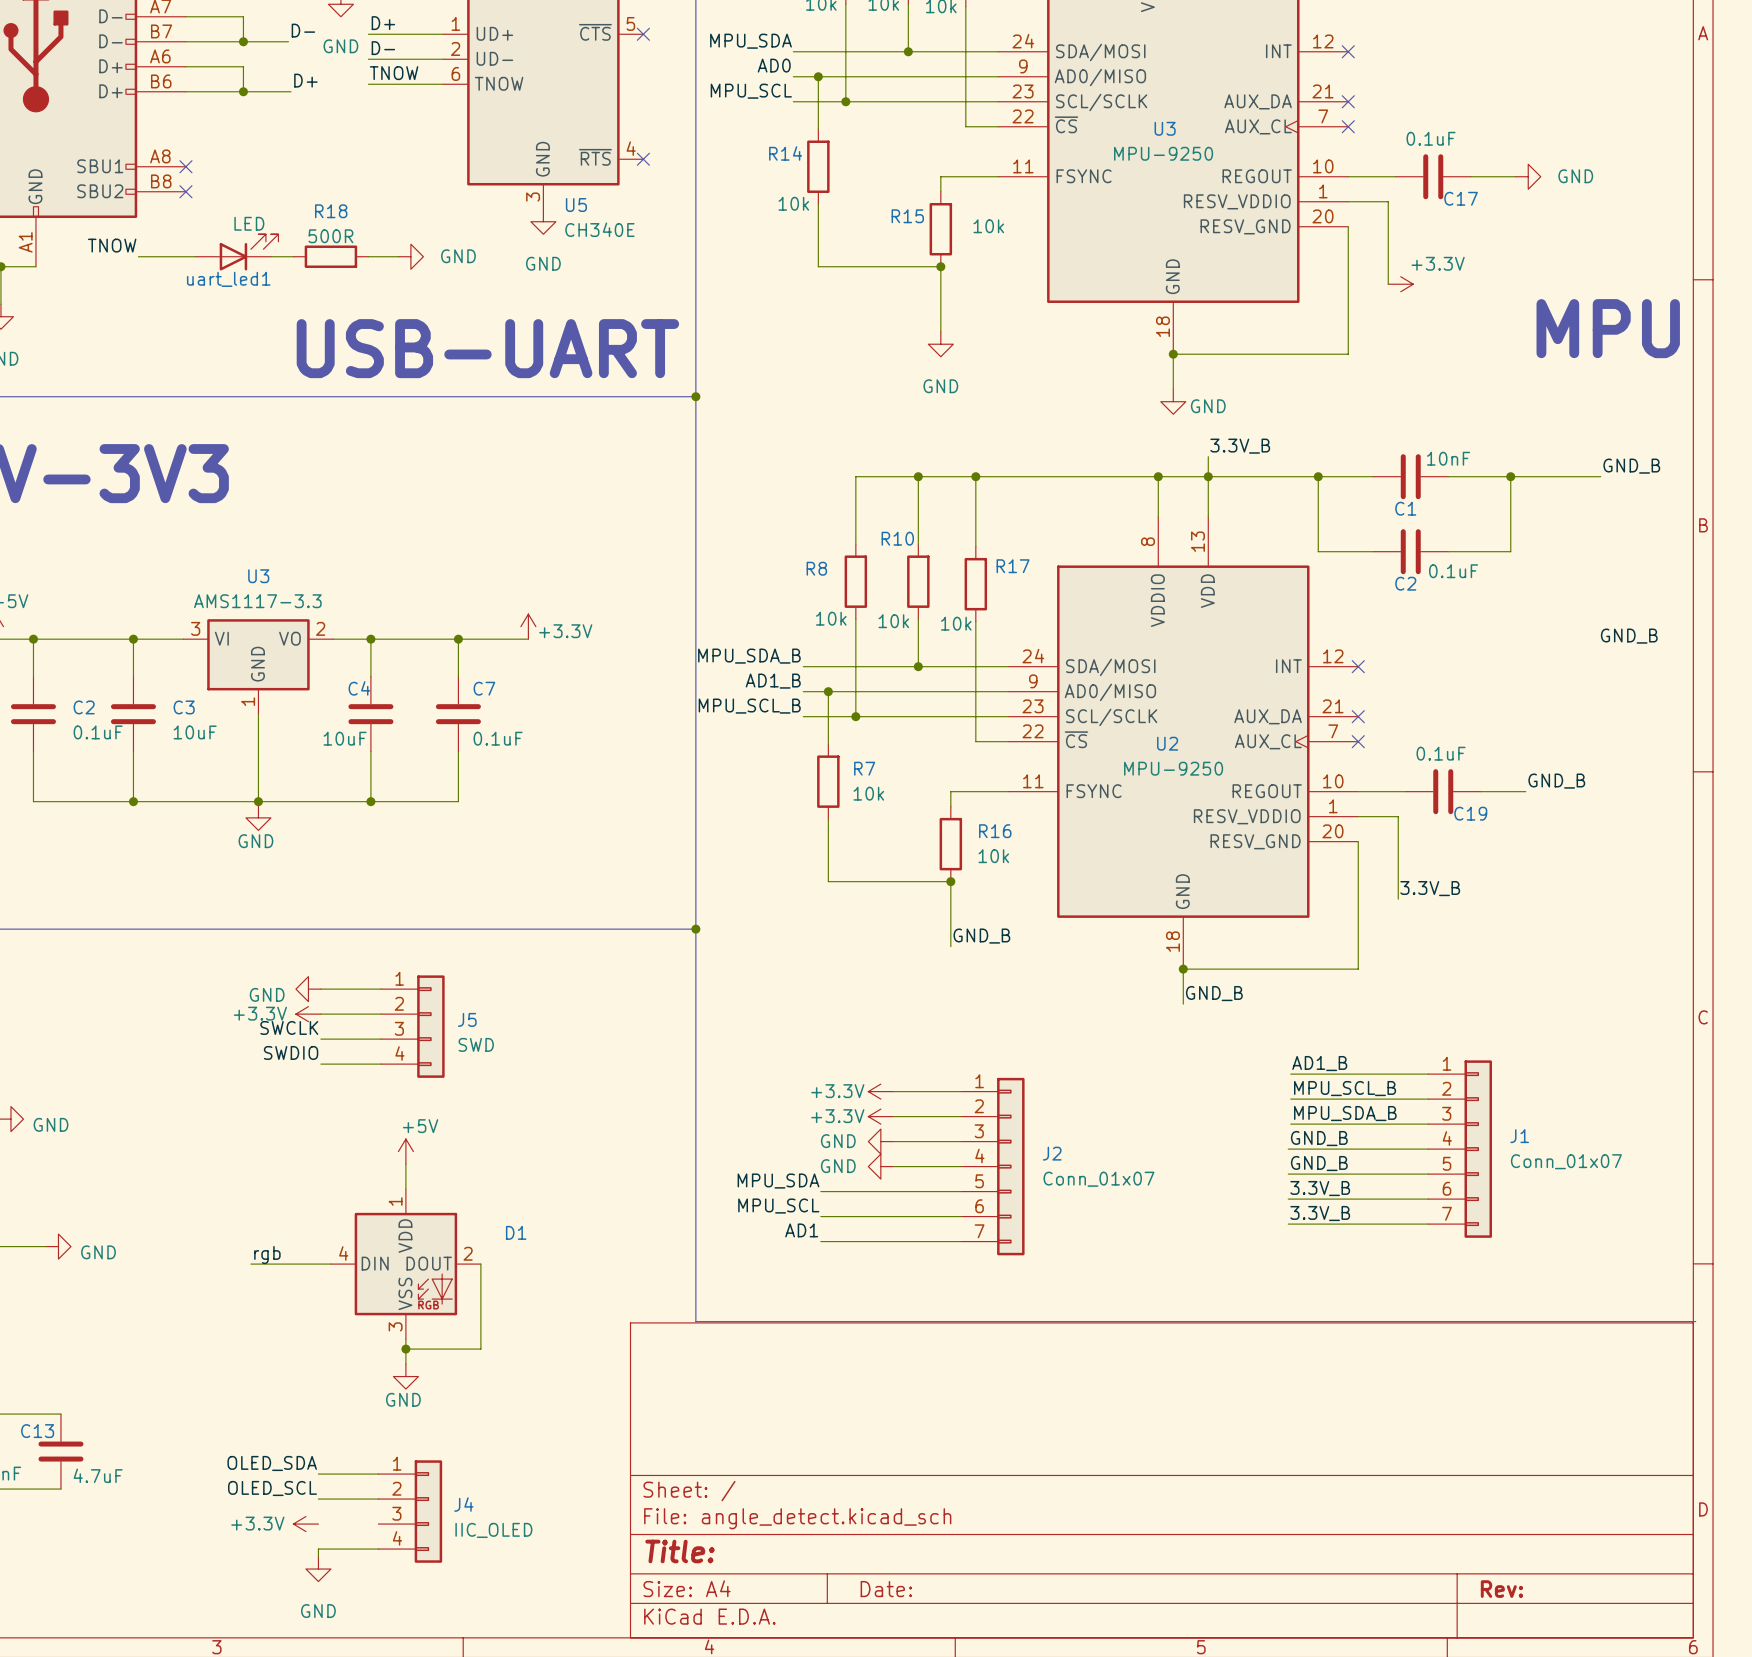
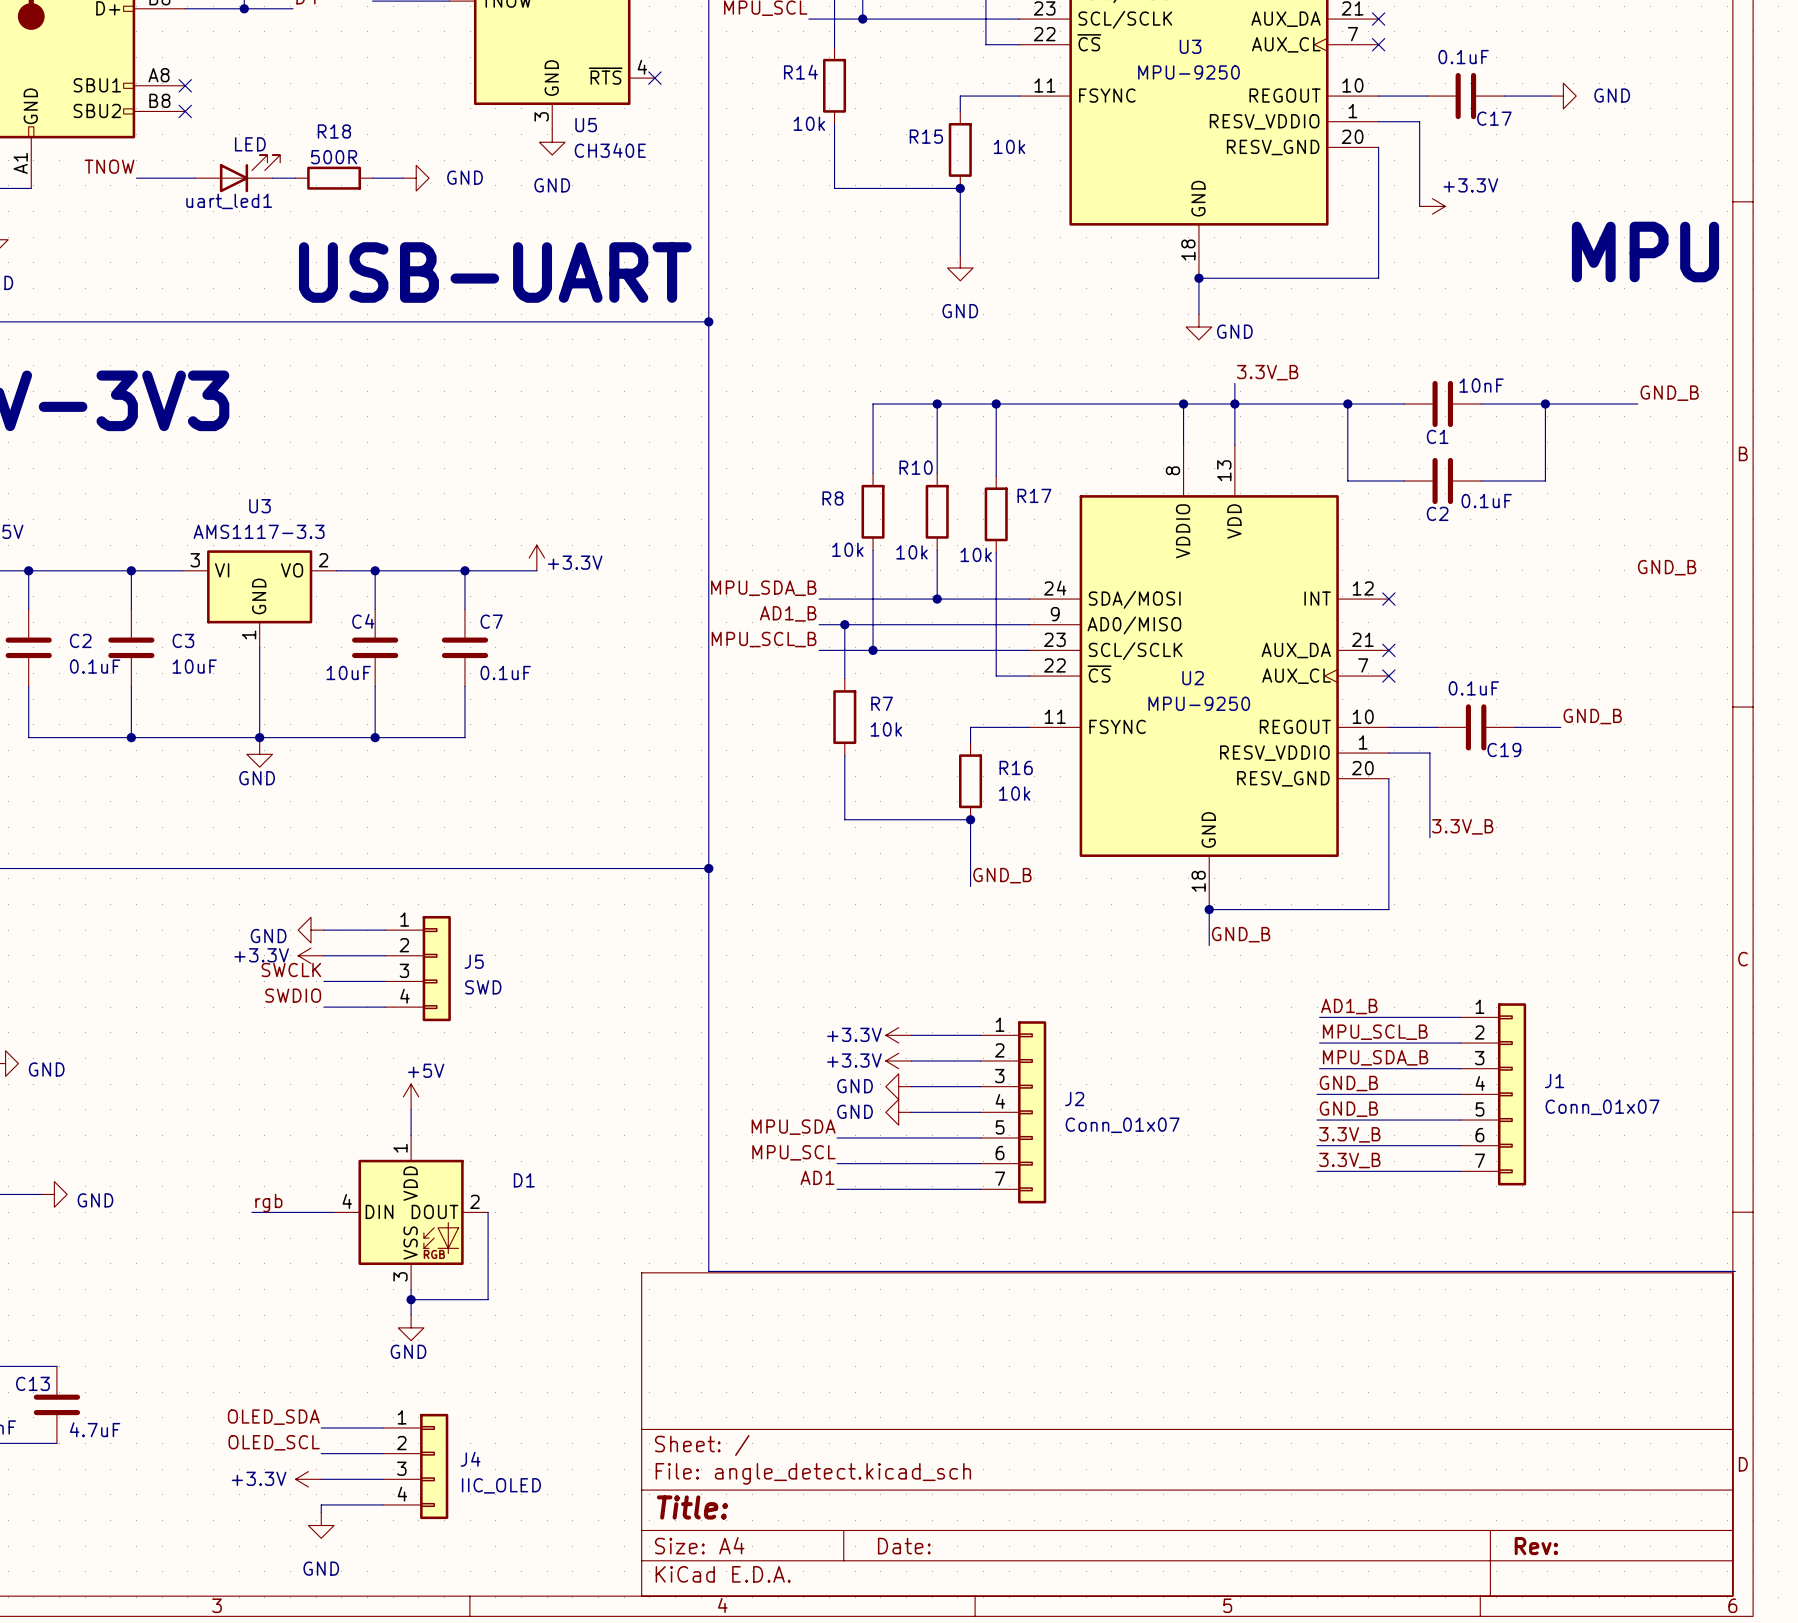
wire: none -> (321, 1479) (382, 1479)

